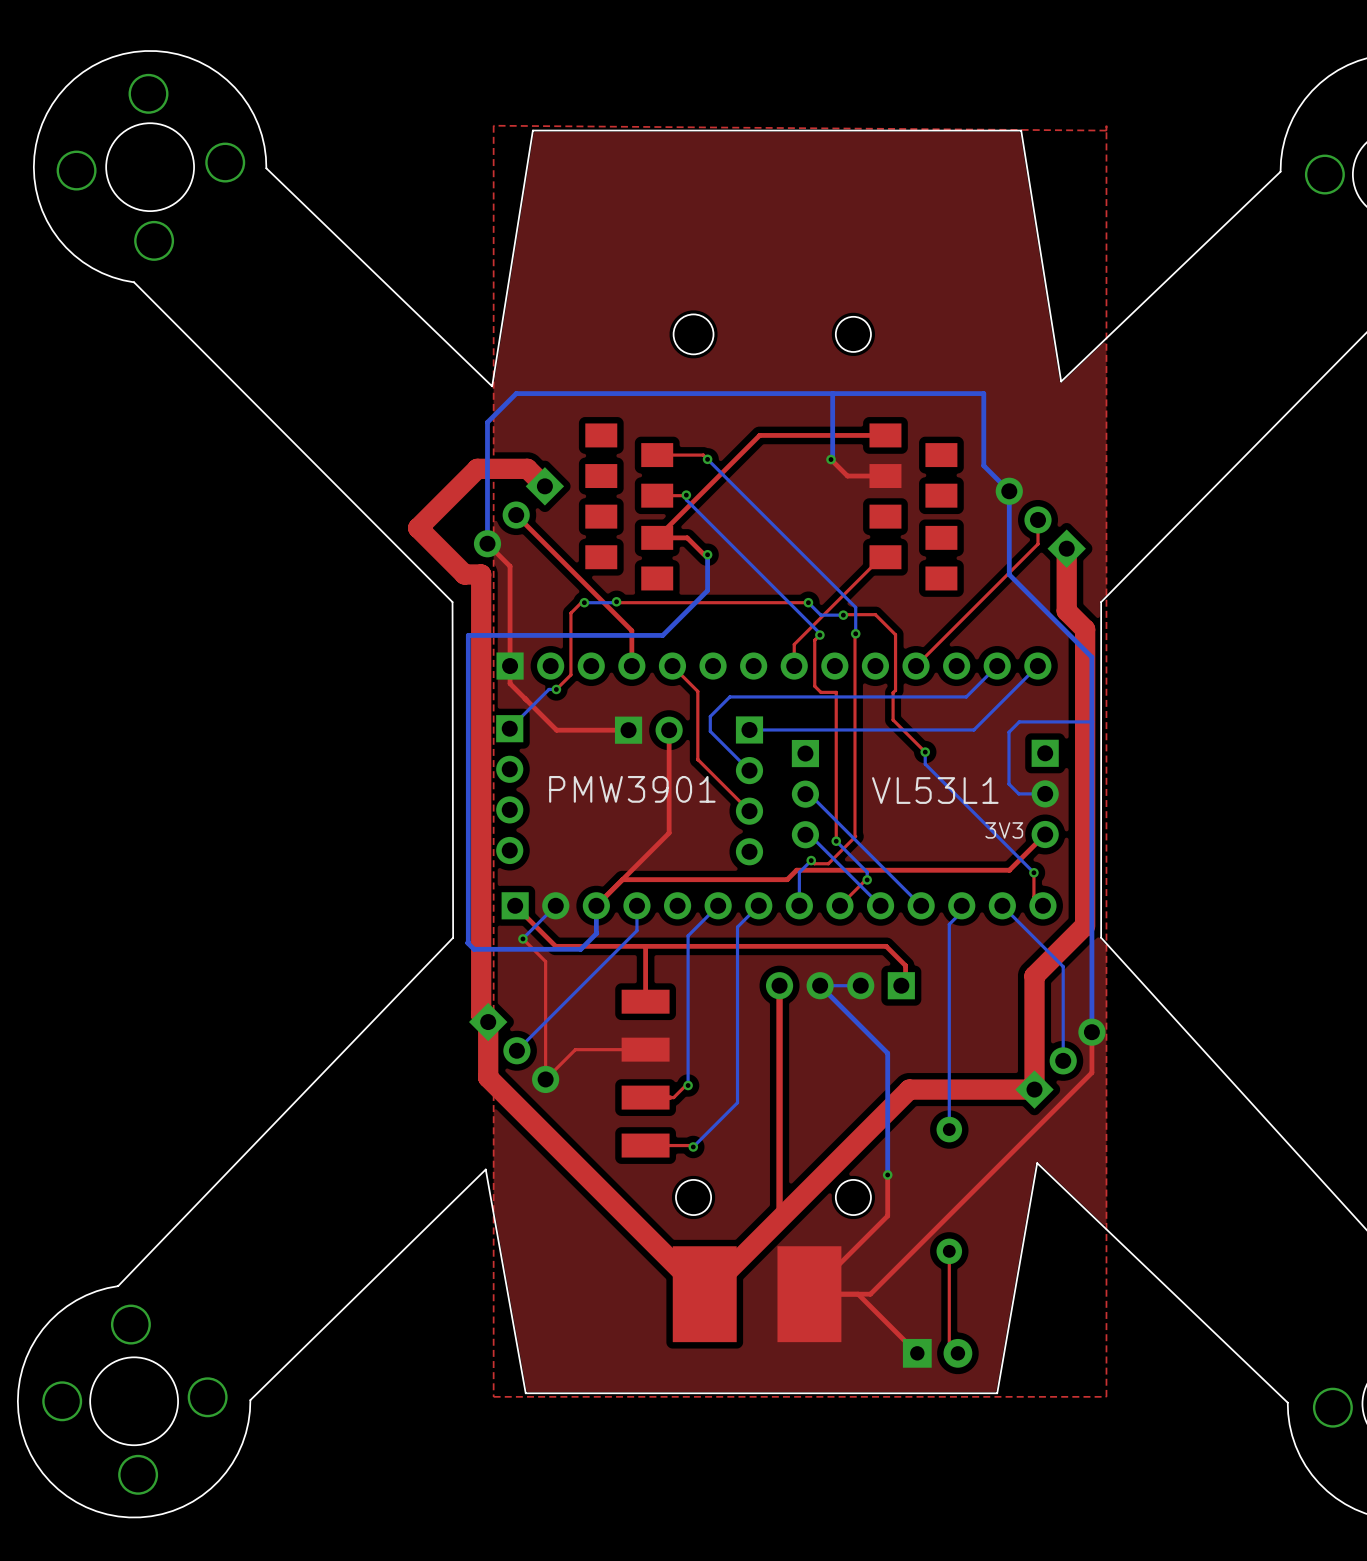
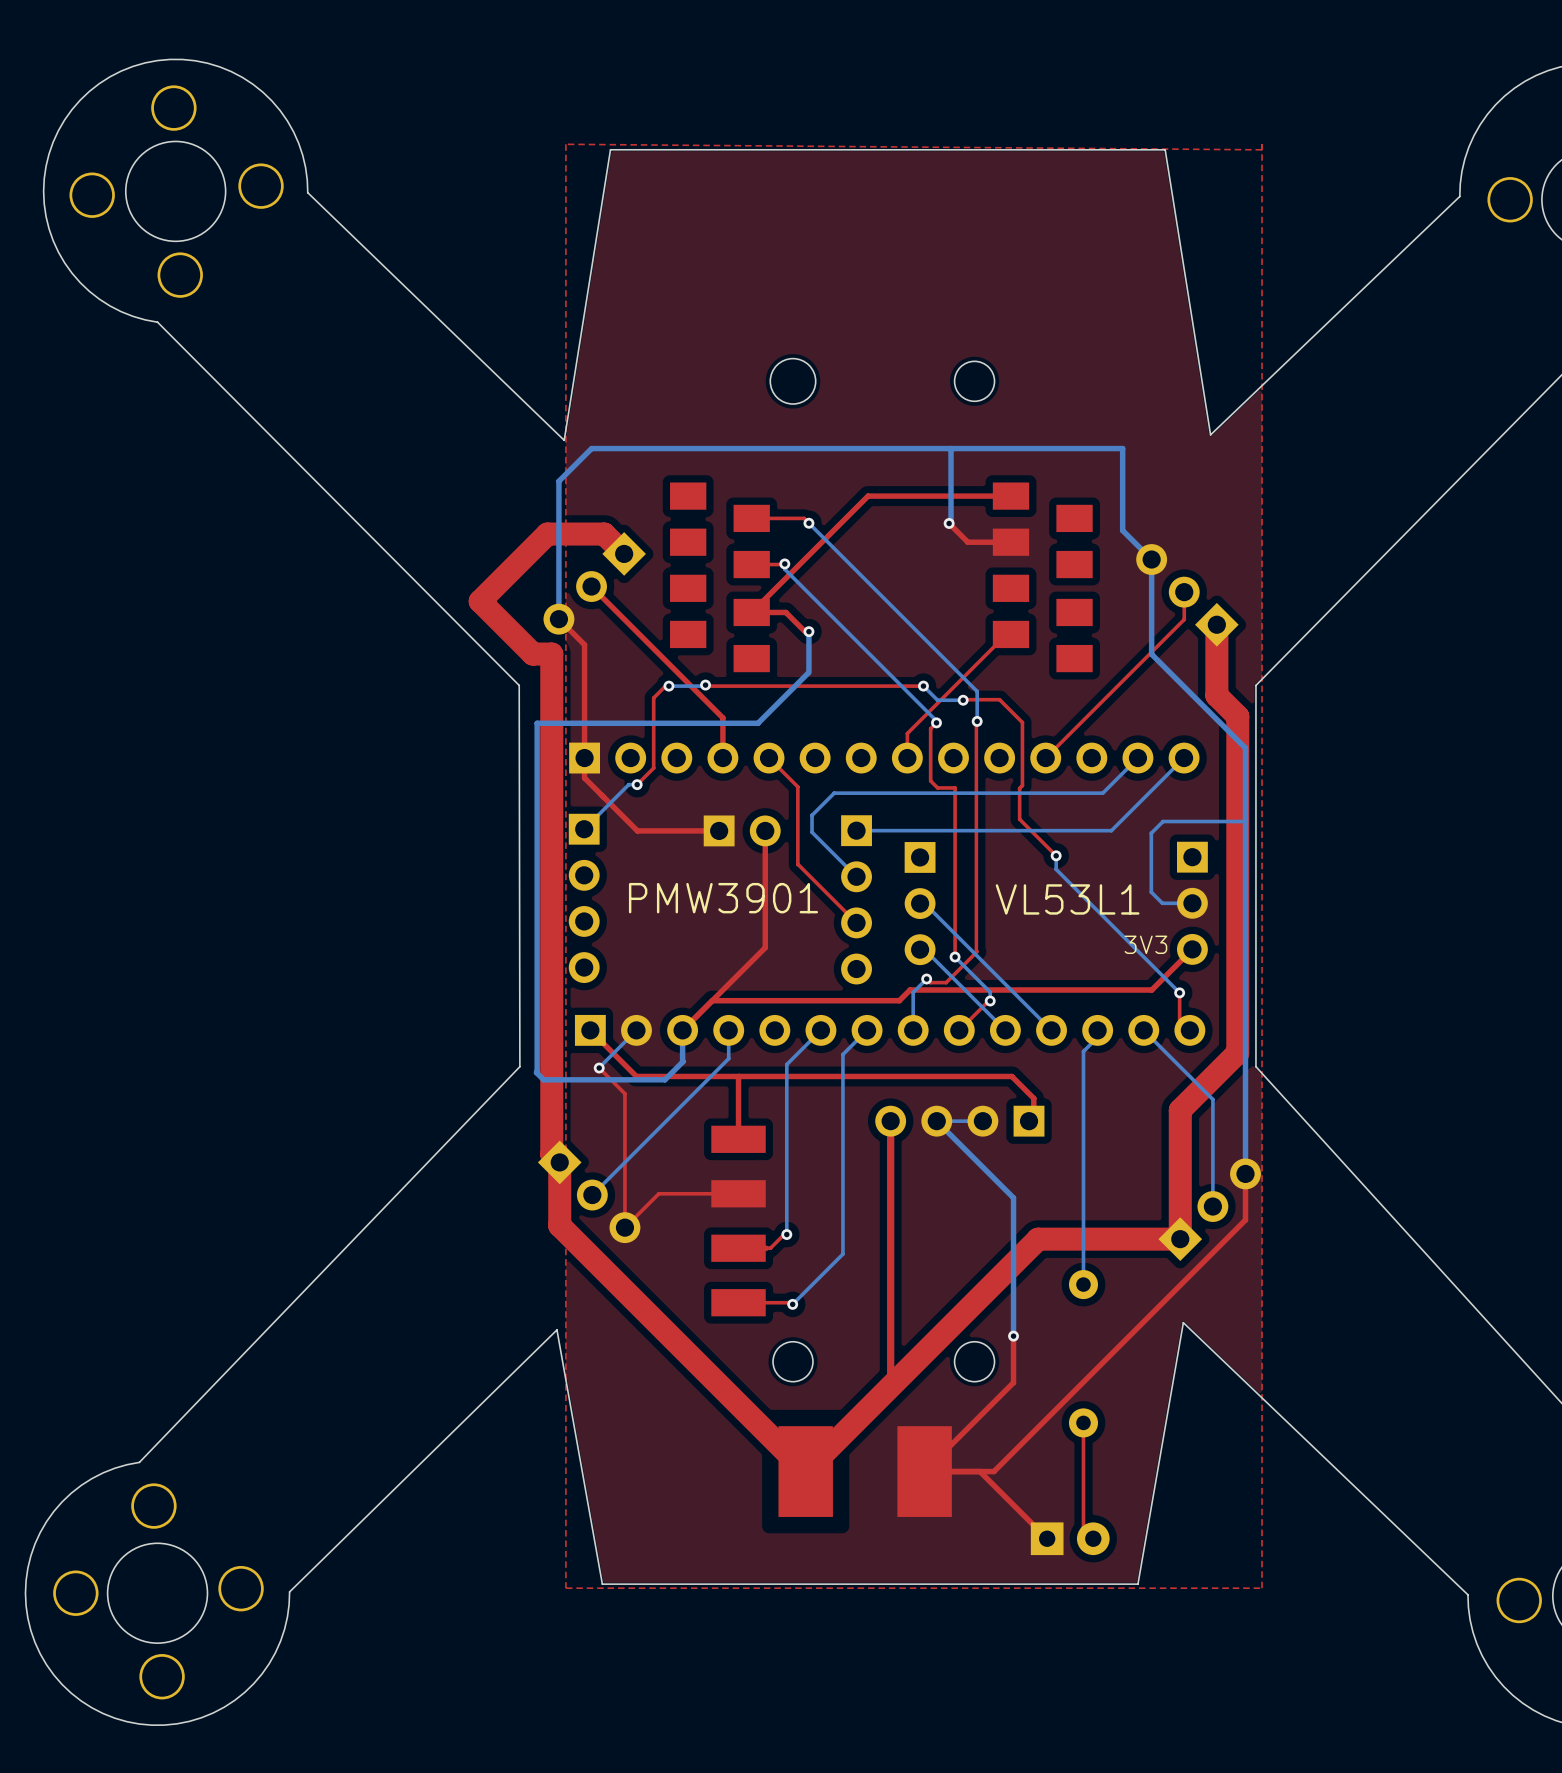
part footprint: [672, 1246, 737, 1343] -> [778, 1426, 833, 1517]
part footprint: [777, 1246, 842, 1343] -> [897, 1426, 952, 1517]

